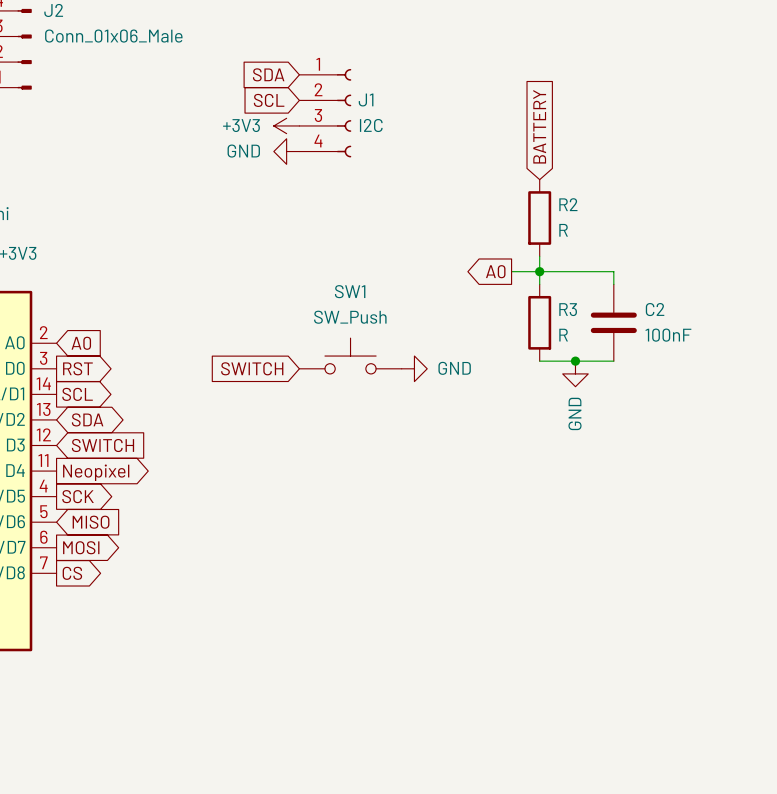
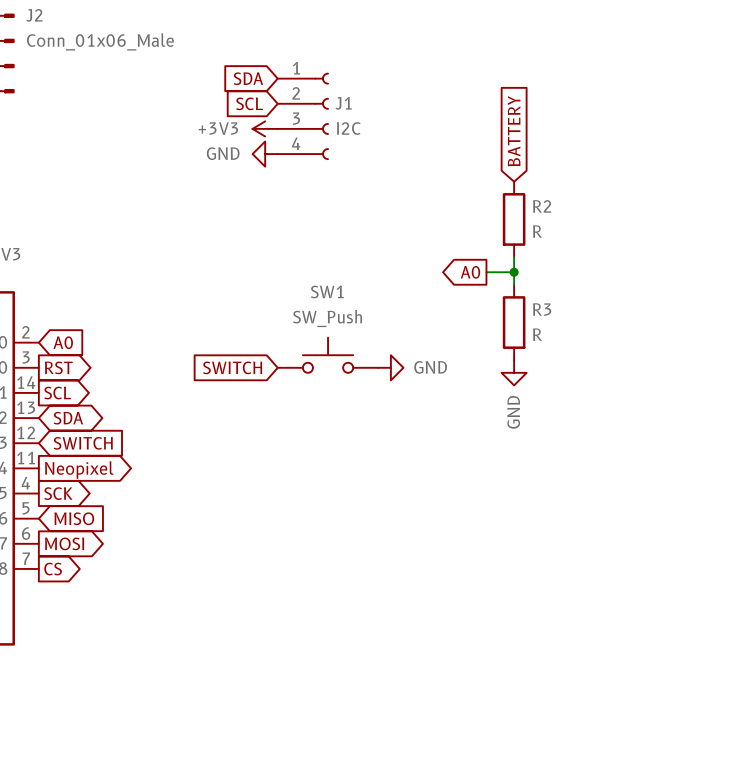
wire: (542, 271) (613, 271) (613, 284) -> none
C2: 100nF (613, 322) -> none
wire: (539, 361) (613, 361) -> none
junction: (575, 361) -> none
power symbol position: GND (575, 373) -> GND (514, 372)

